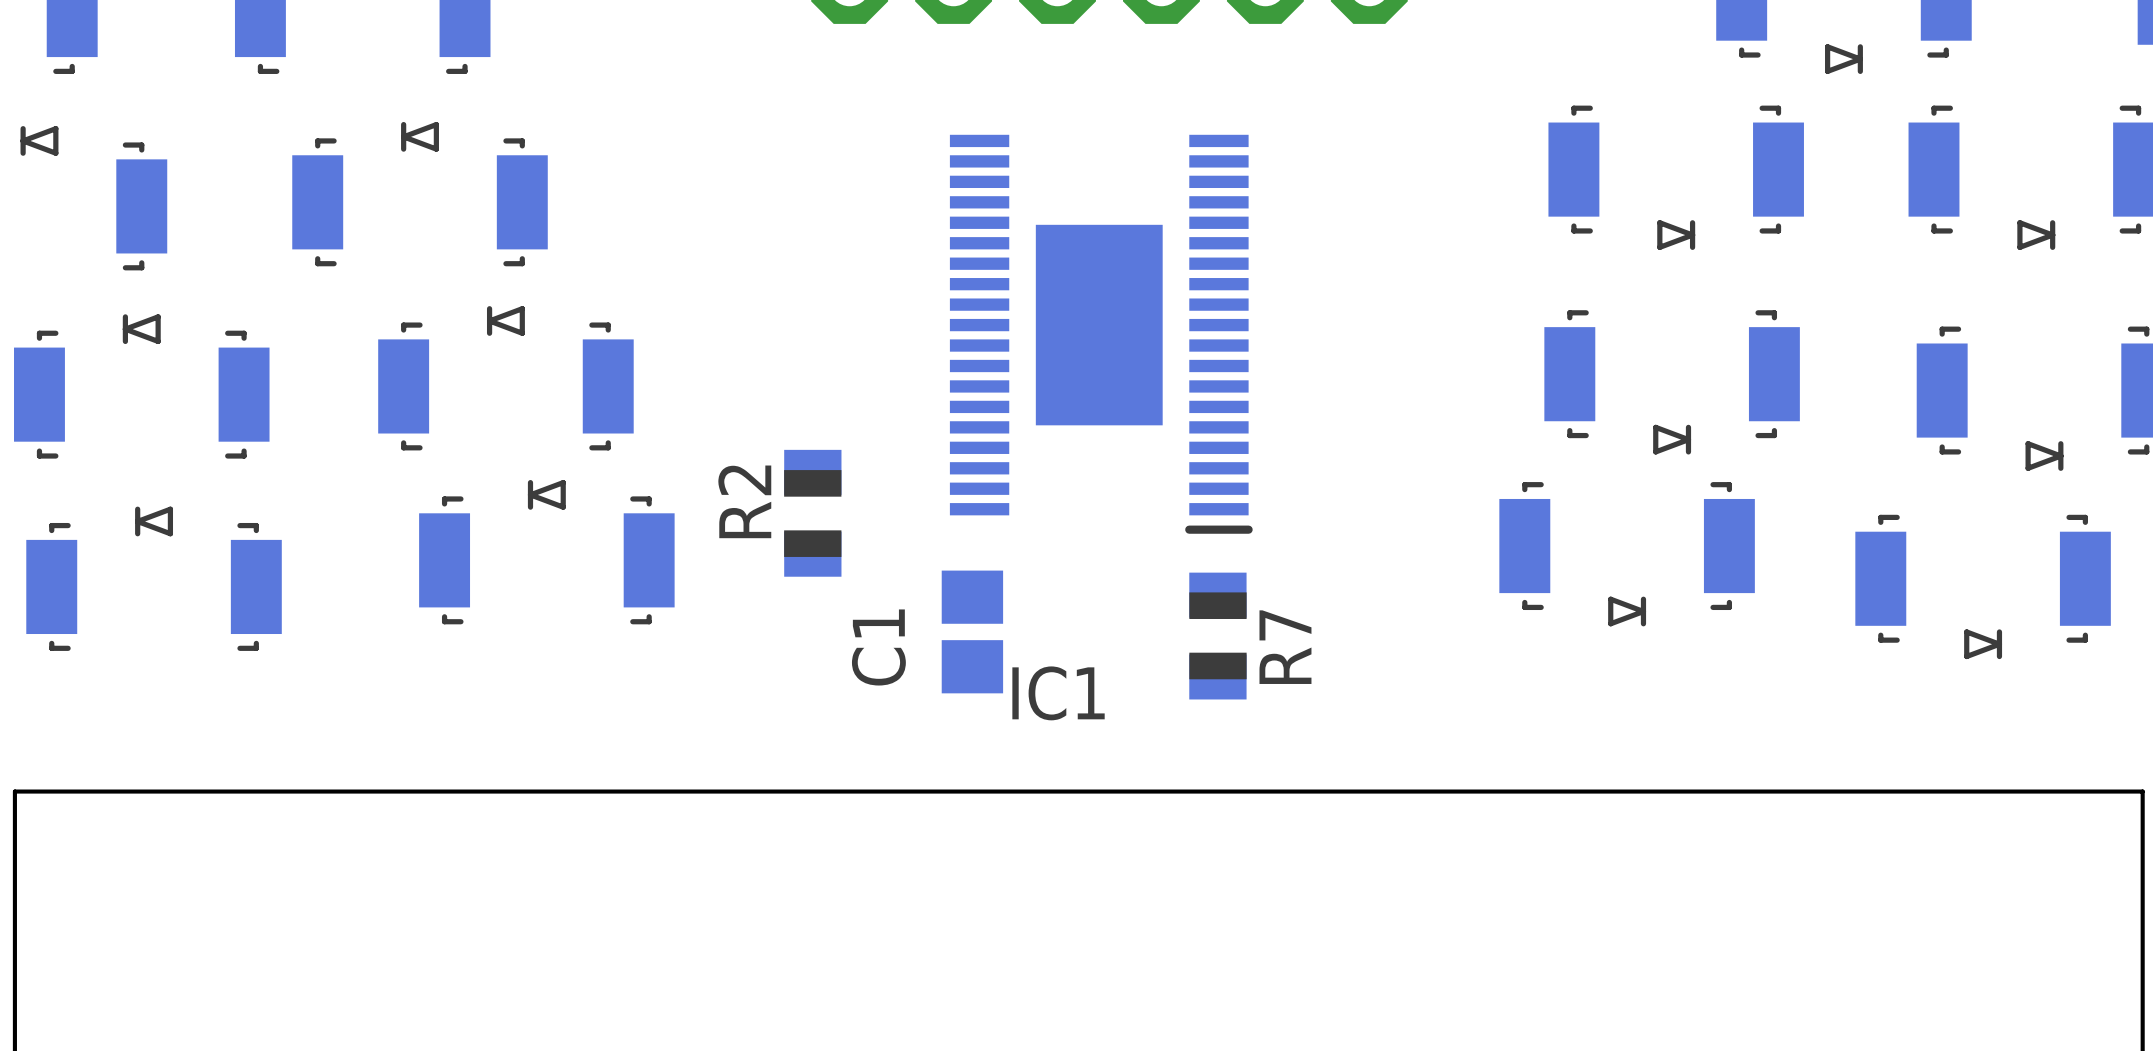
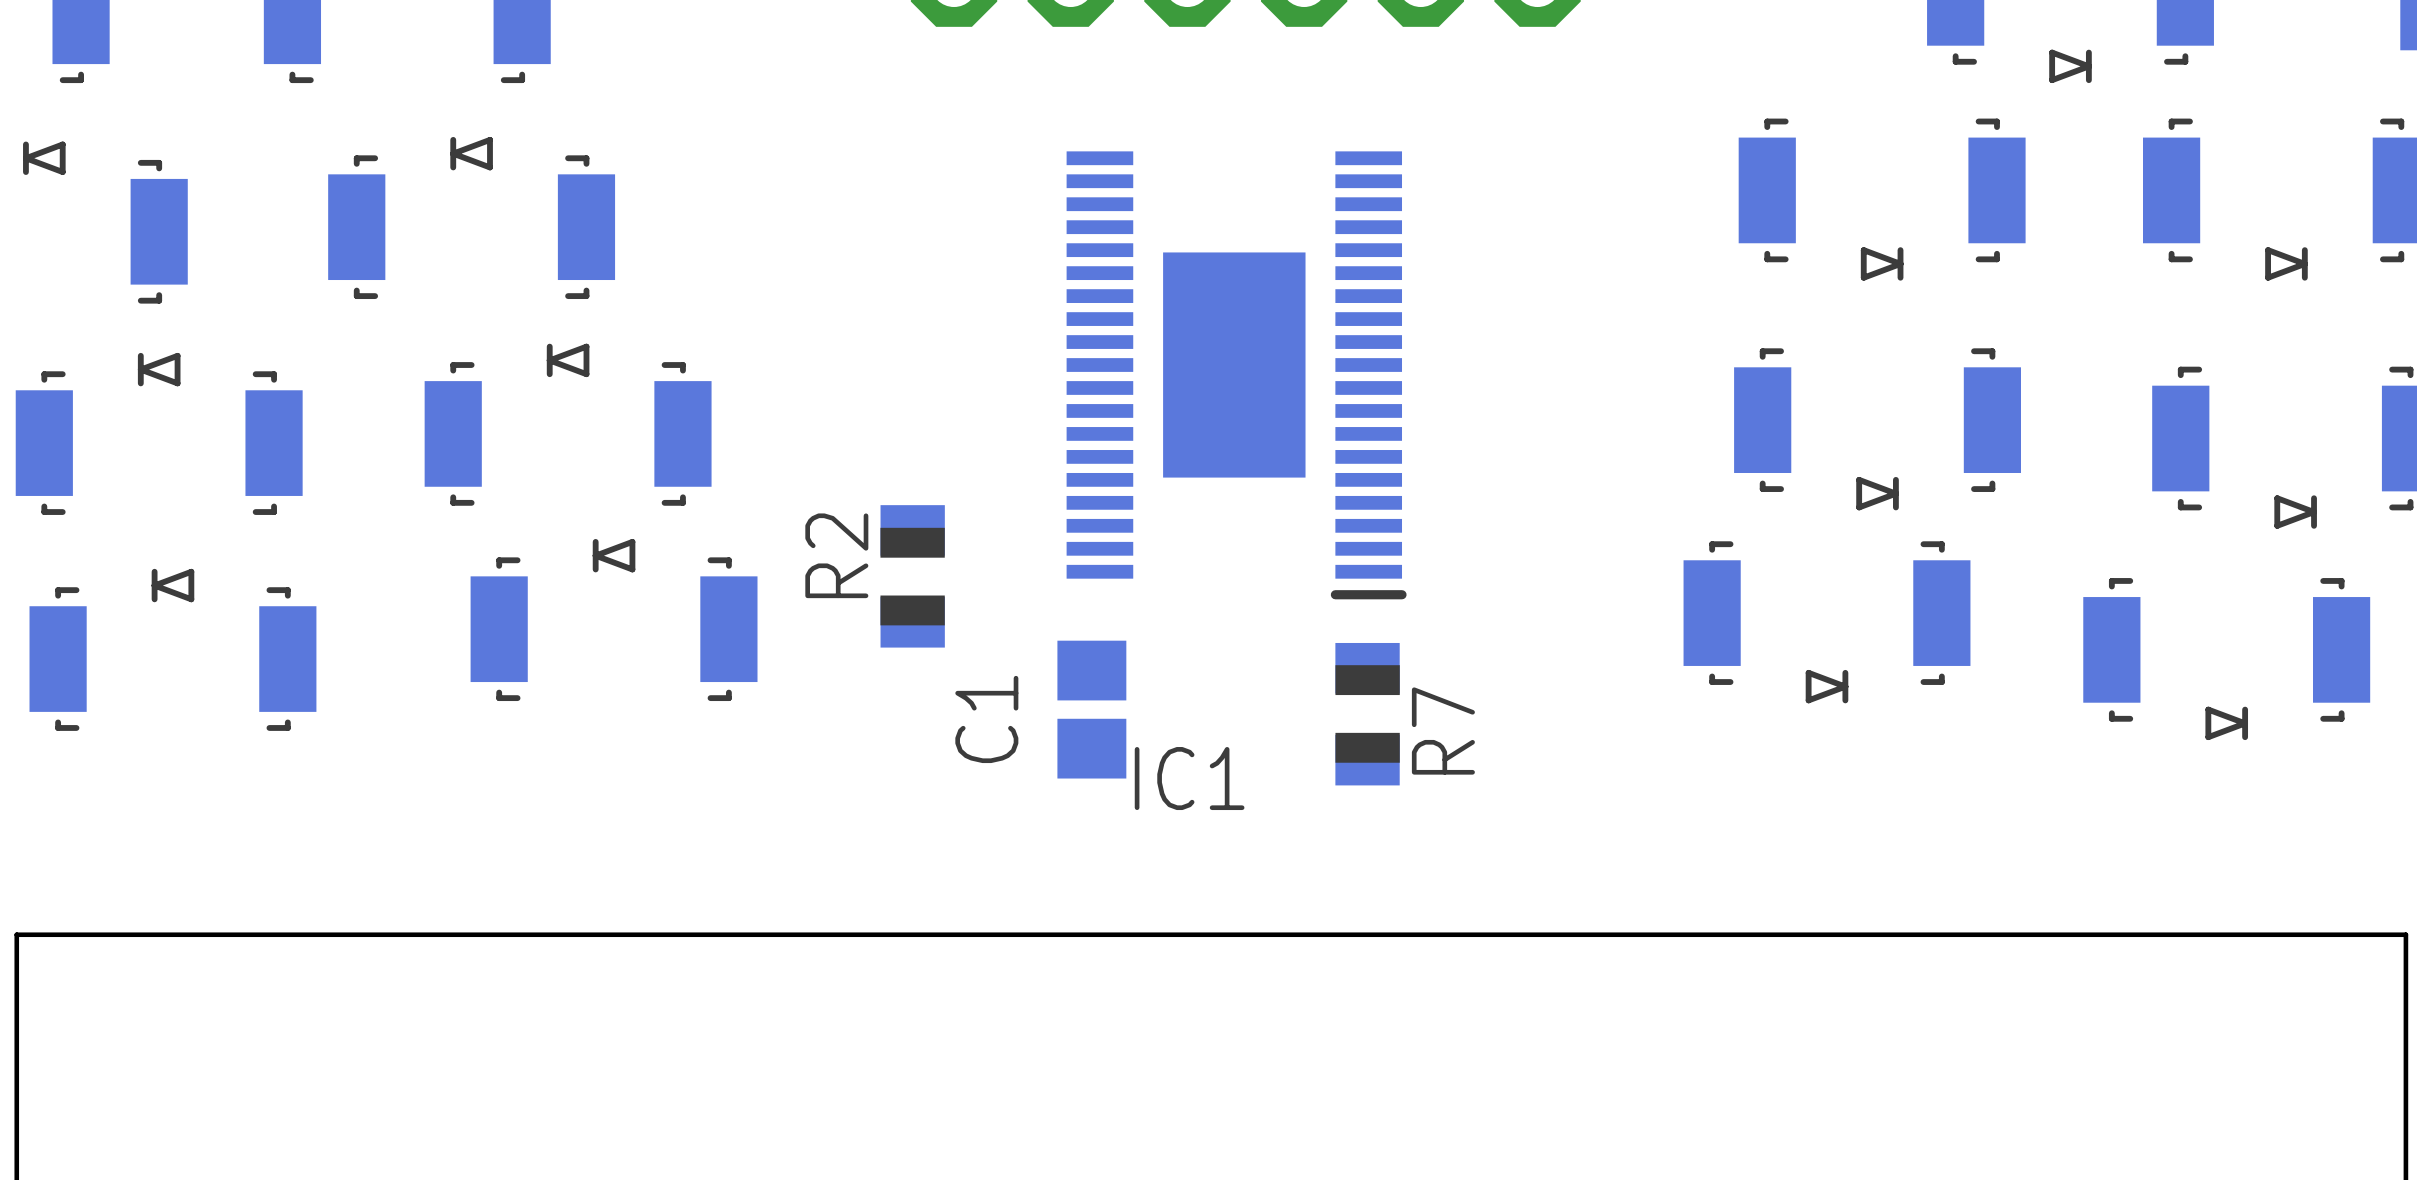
board edge: (2142, 832) (2142, 791) (14, 791) (14, 832) -> (2405, 934) (16, 934)

